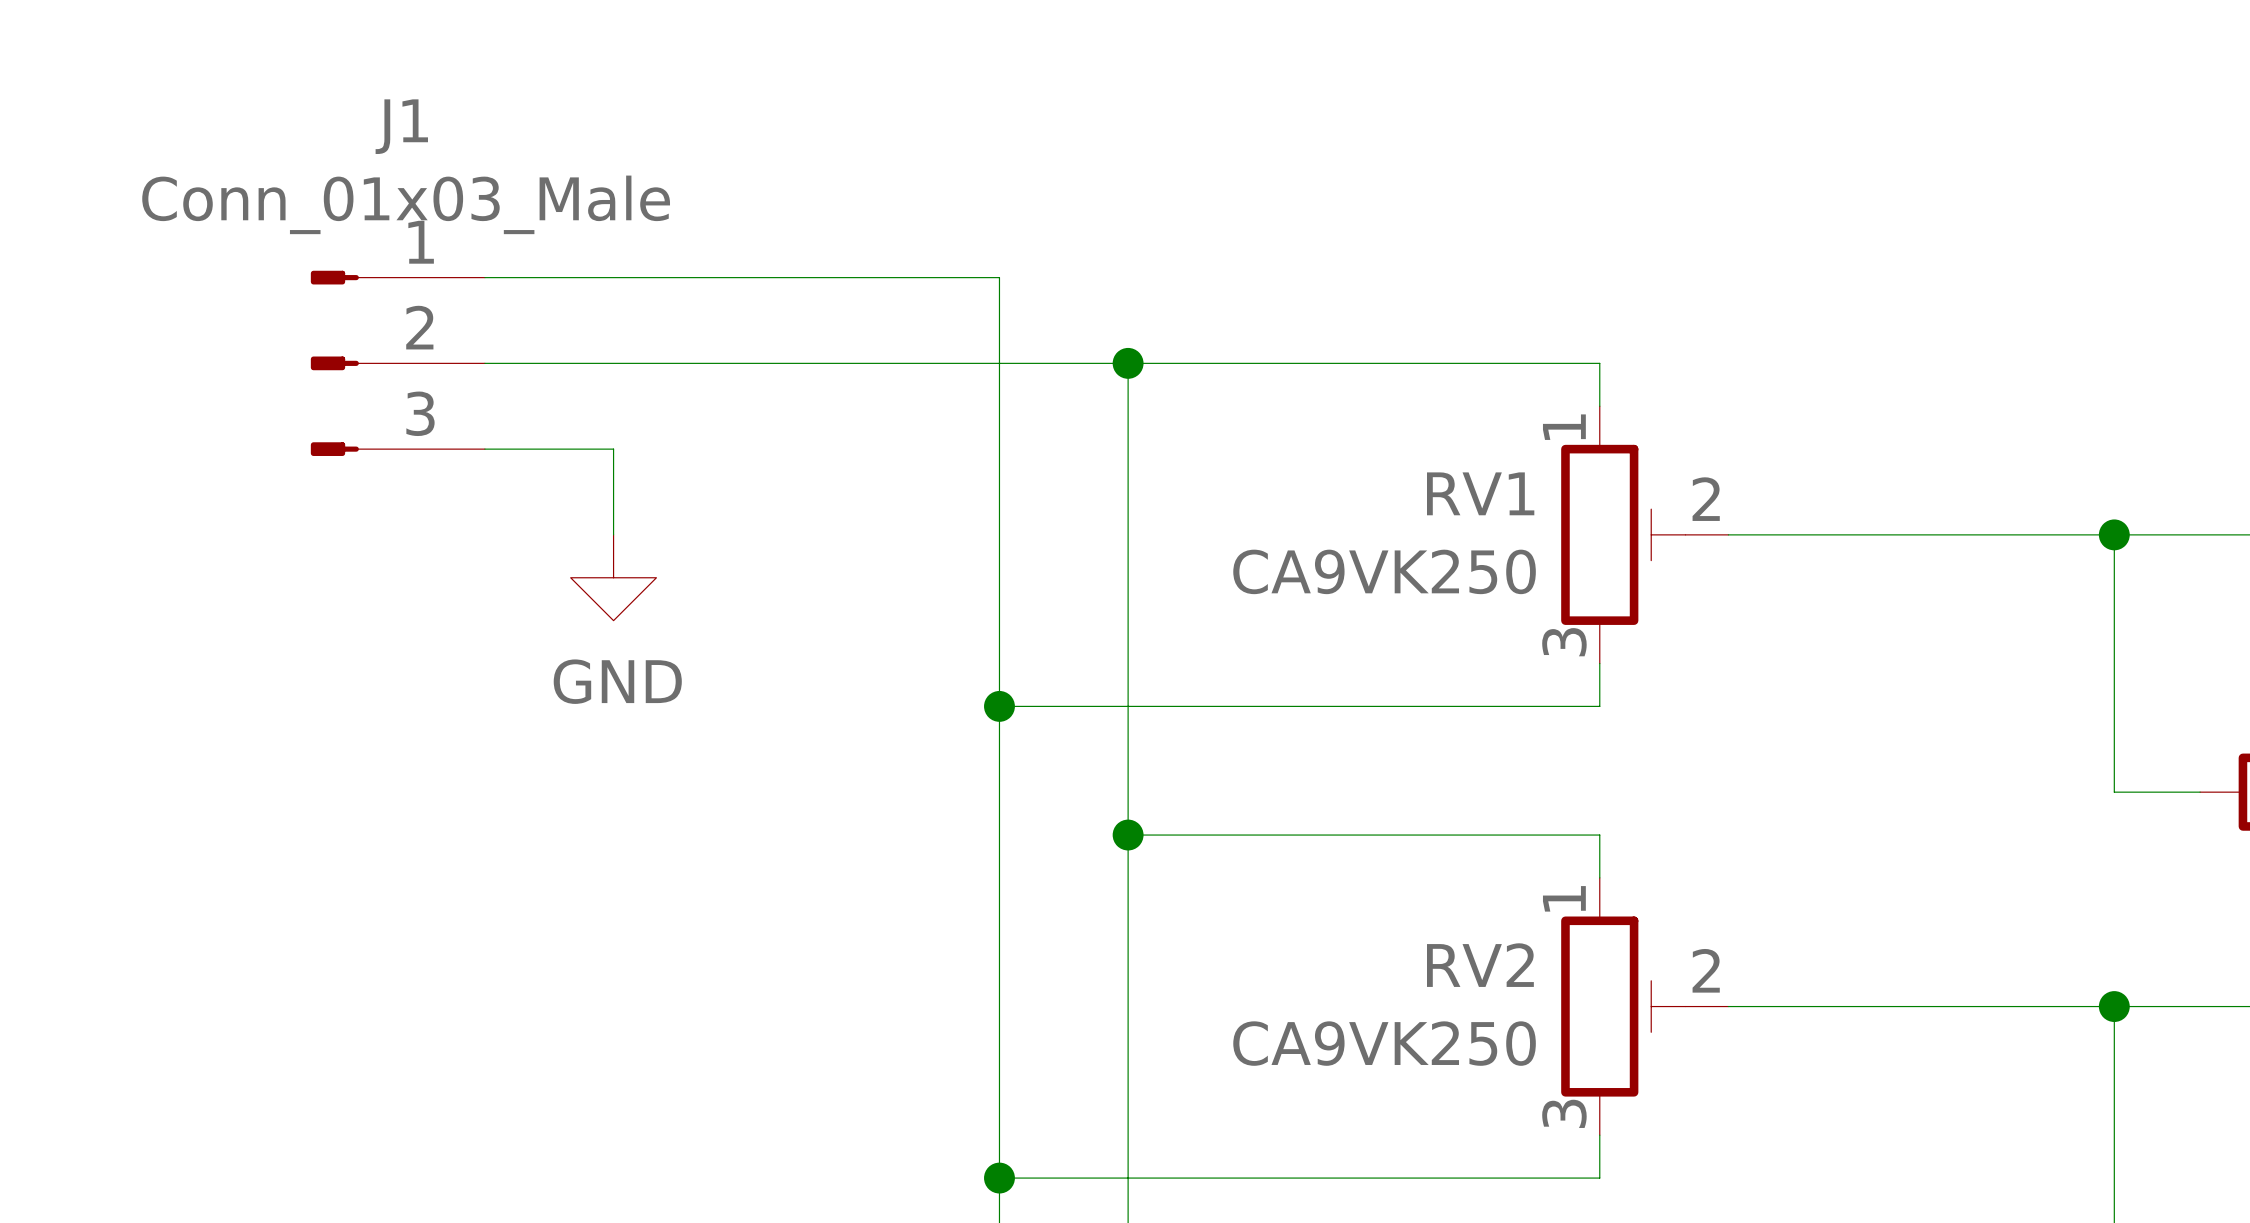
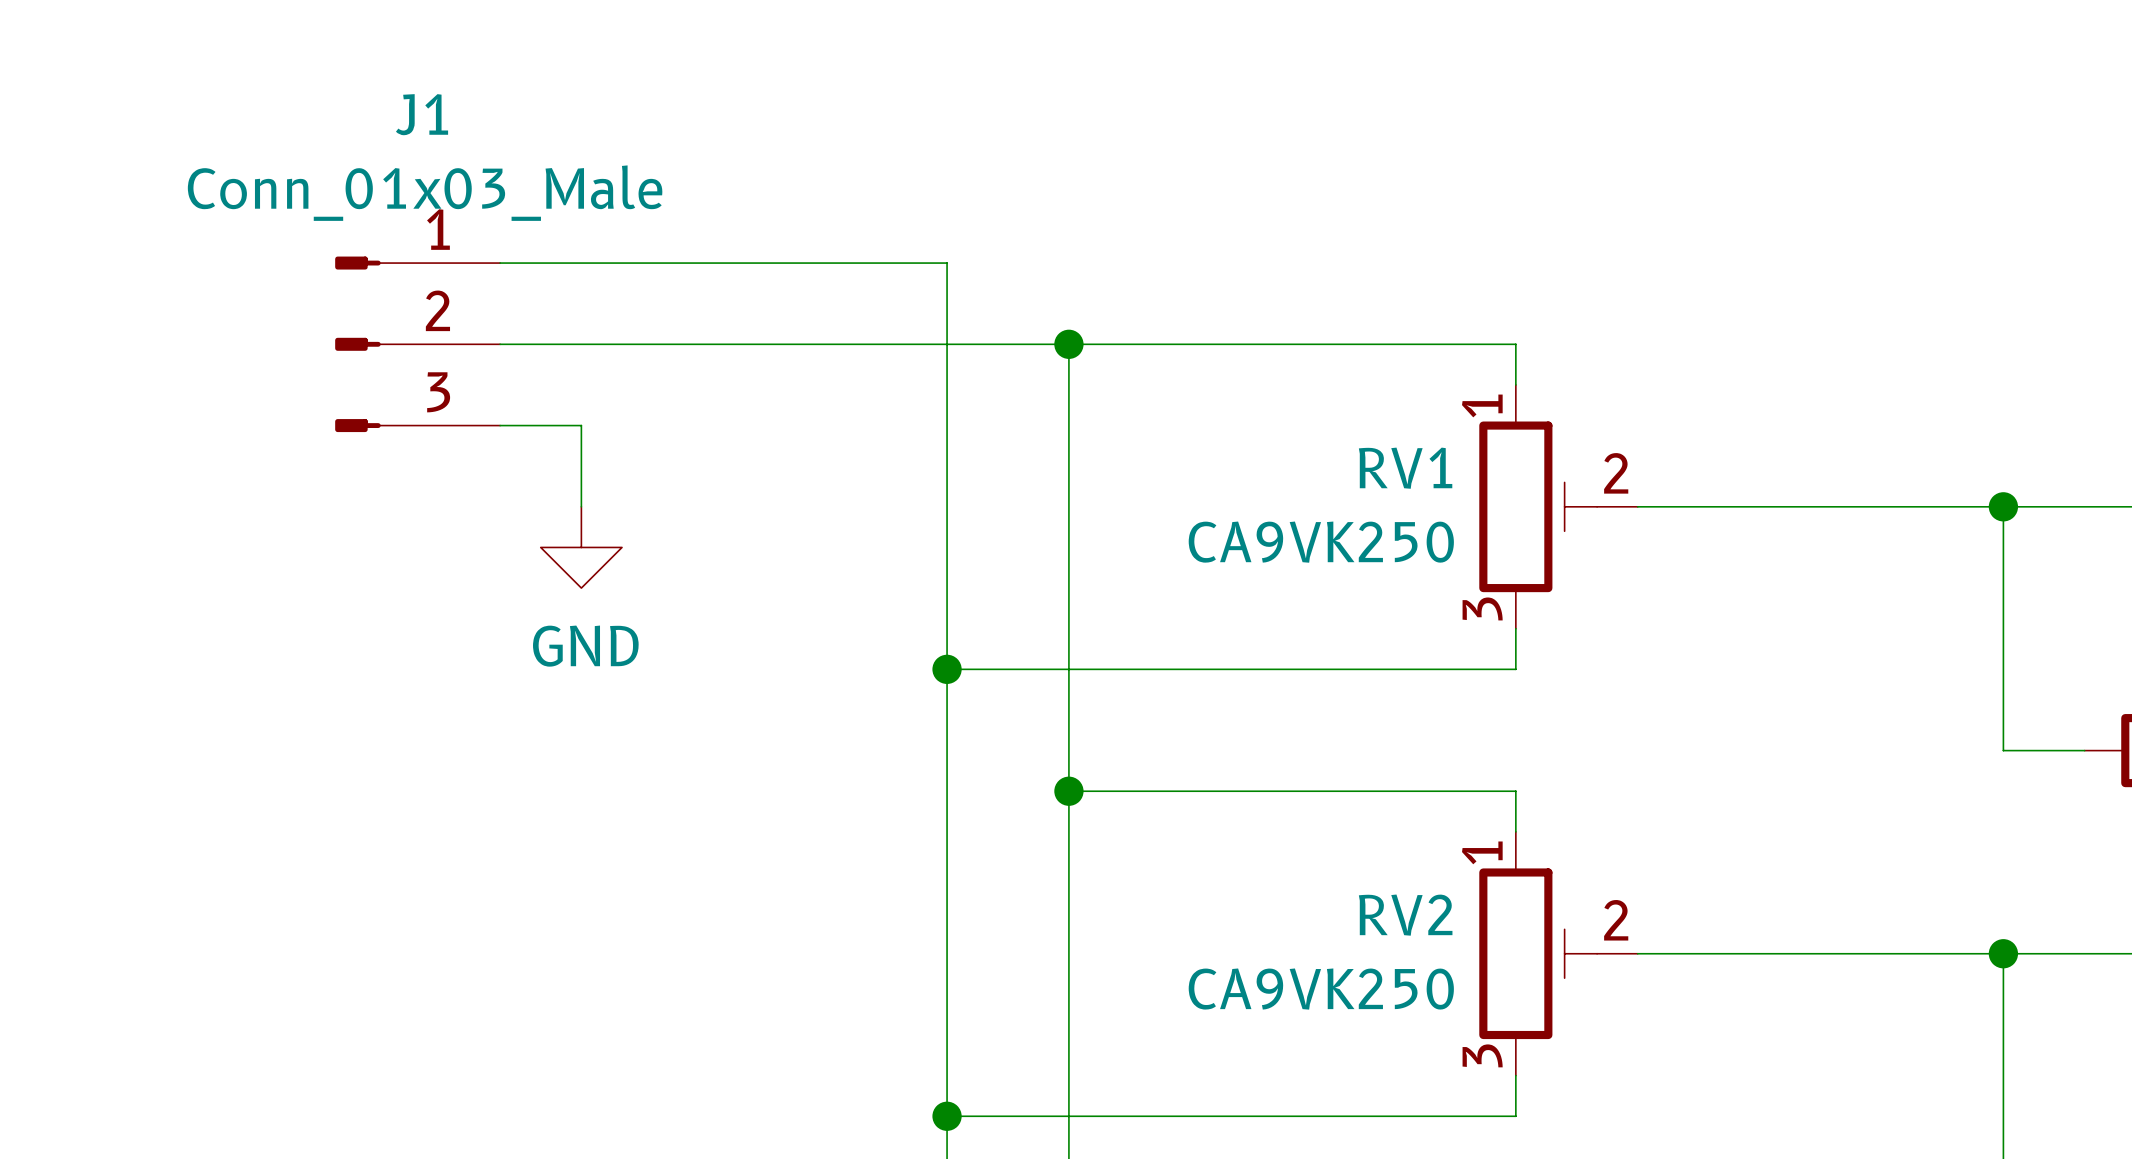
J1 position: (397, 363) -> (417, 344)

